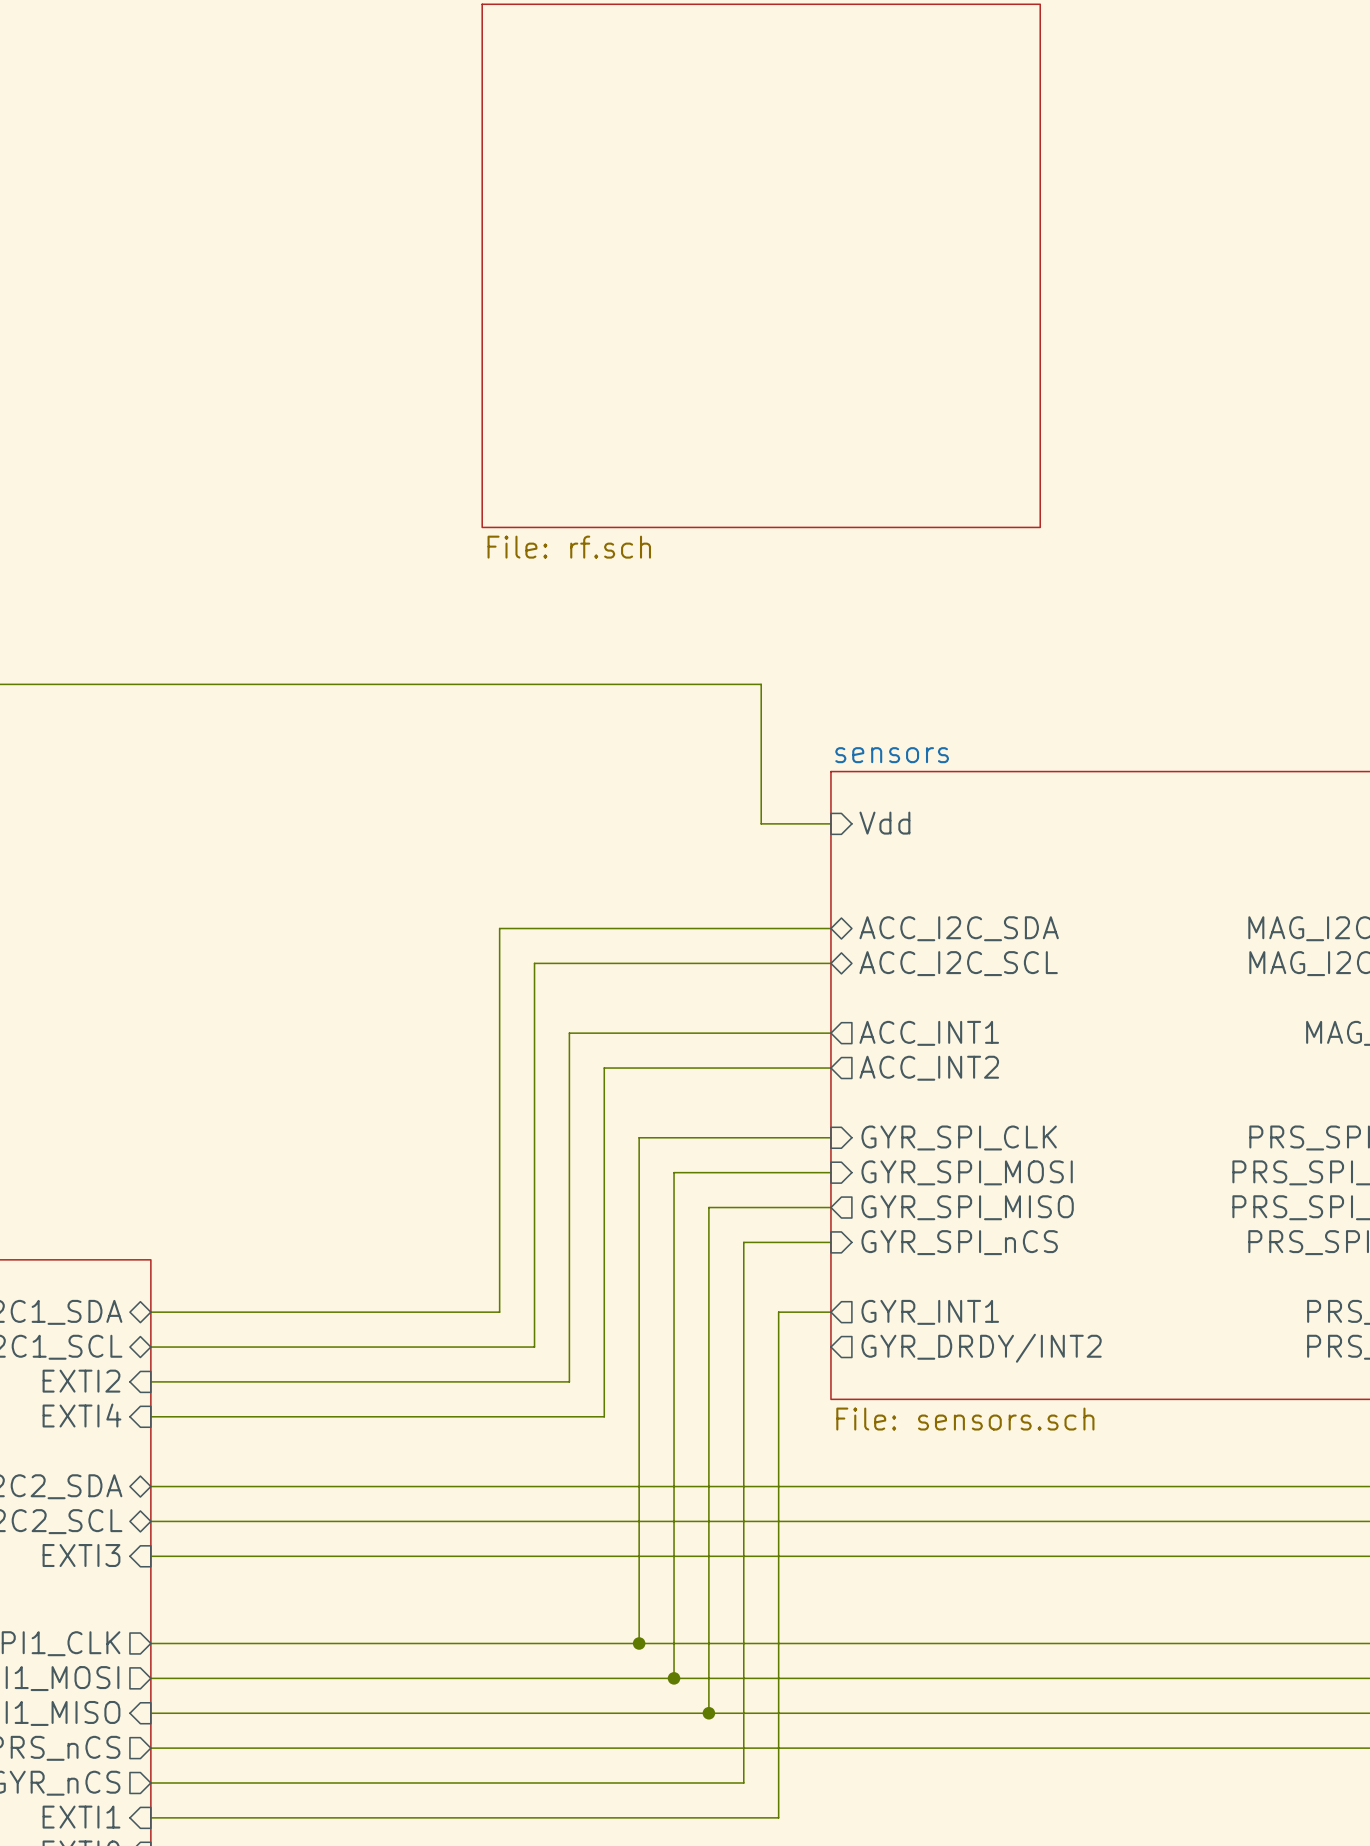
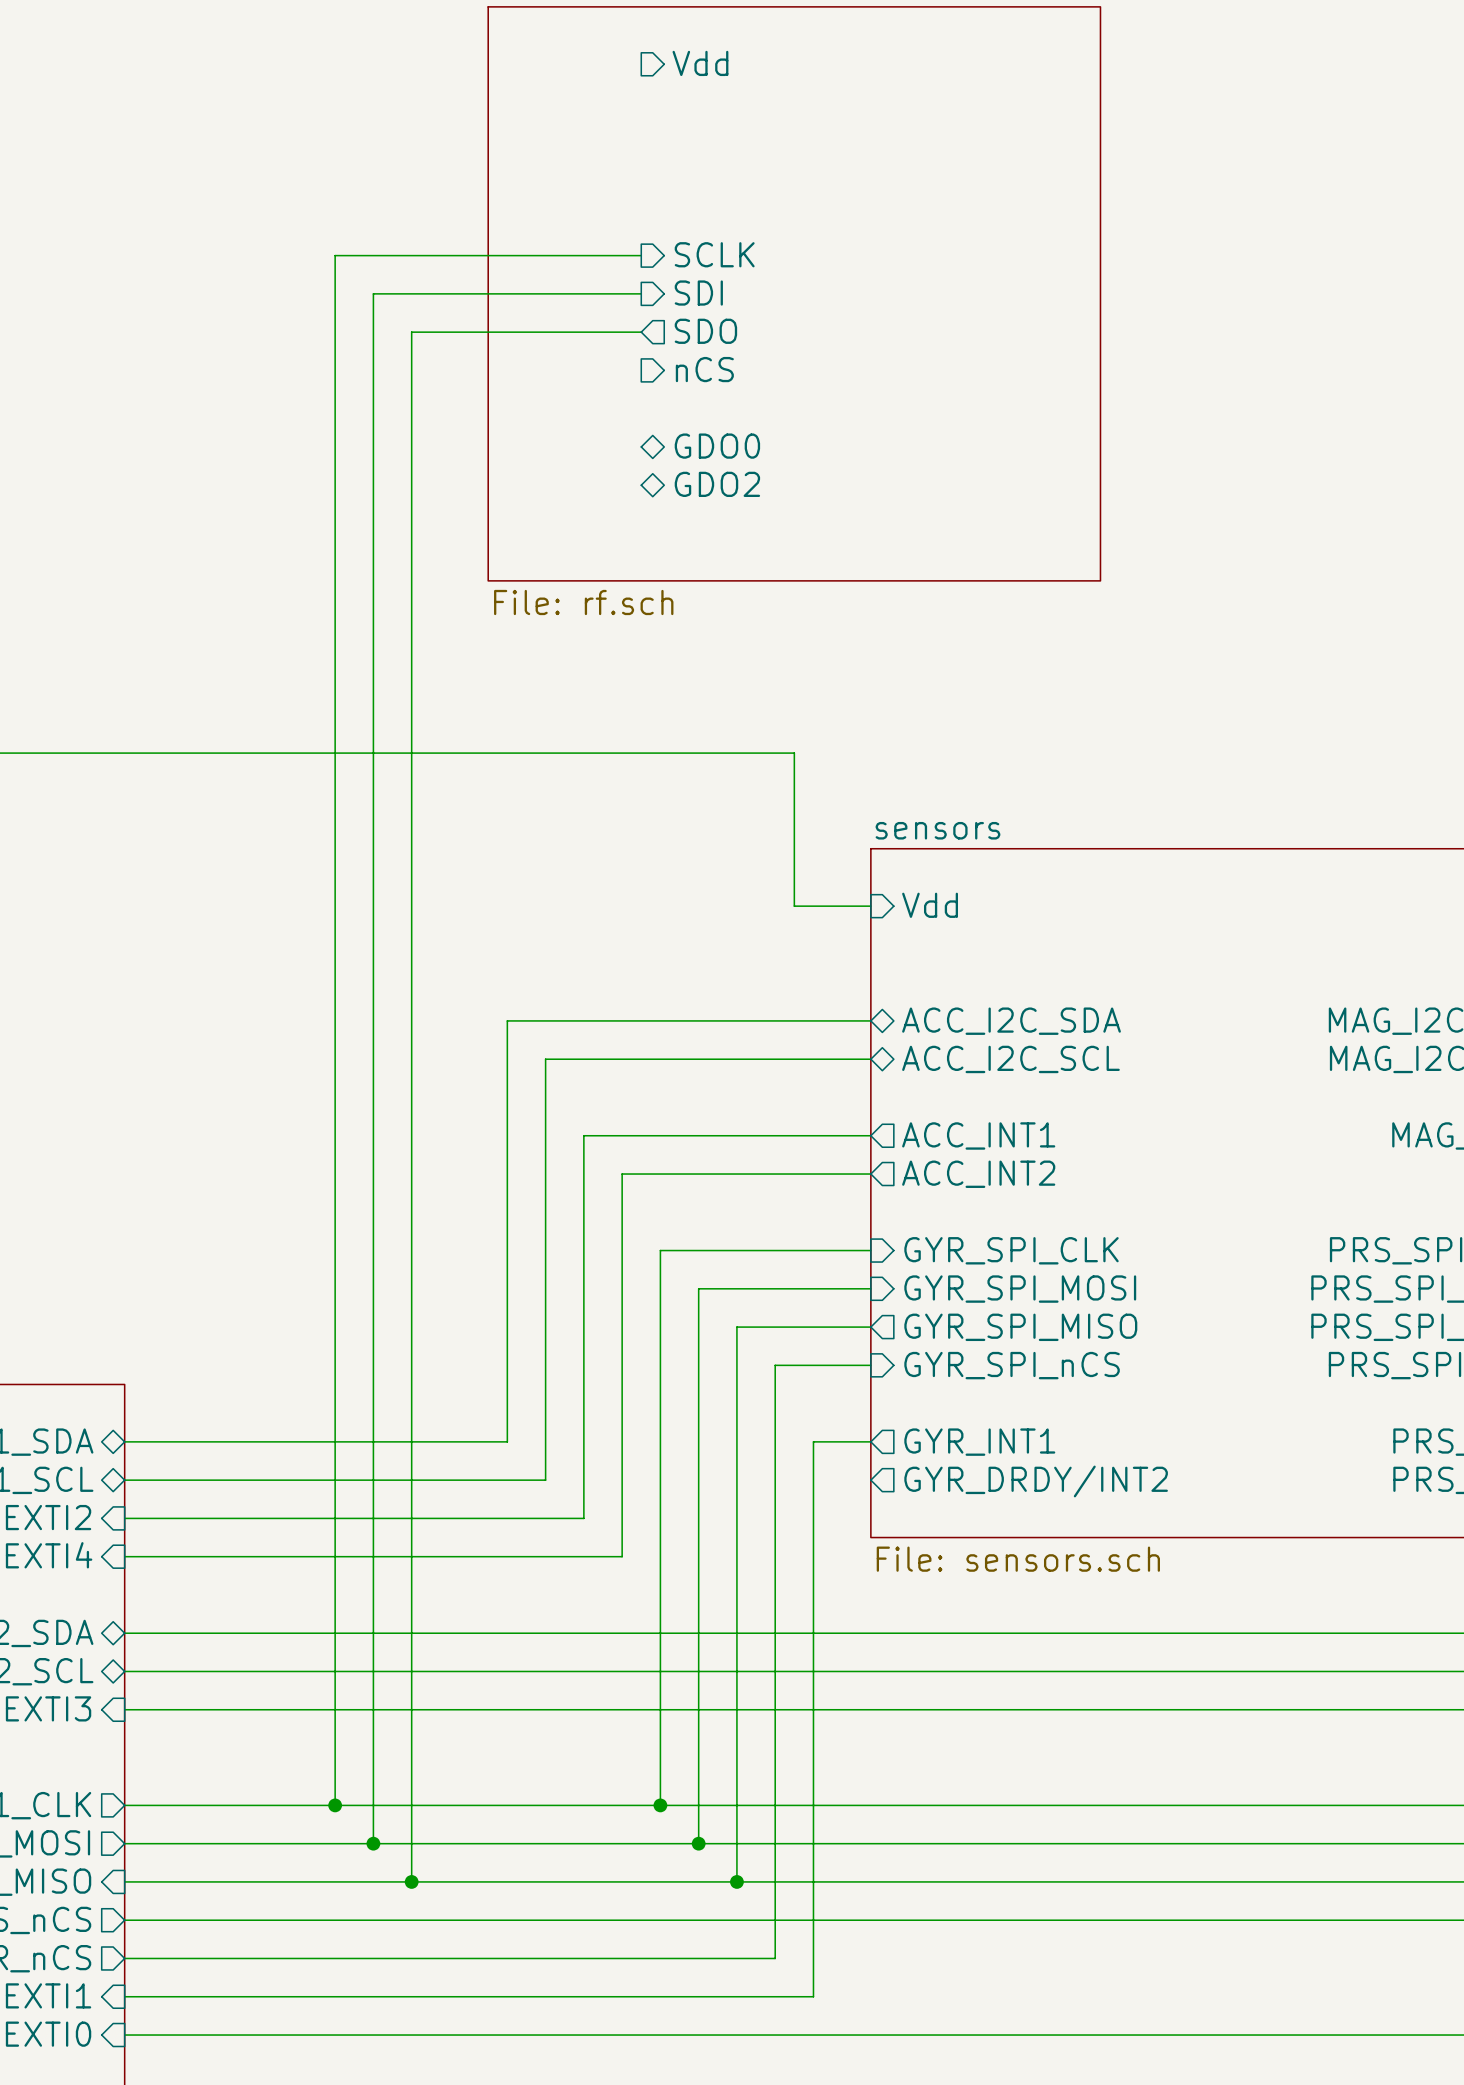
sheet pin: none -> Vdd (700, 63)
wire: none -> (641, 255) (335, 255) (335, 1805)
sheet pin: none -> SCLK (714, 254)
wire: none -> (641, 293) (373, 293) (373, 1843)
sheet pin: none -> SDI (698, 293)
sheet pin: none -> SDO (705, 331)
wire: none -> (641, 332) (411, 332) (411, 1881)
sheet pin: none -> nCS (704, 369)
sheet pin: none -> GDO0 (717, 446)
sheet pin: none -> GDO2 (717, 484)
junction: none -> (335, 1805)
junction: none -> (373, 1843)
junction: none -> (411, 1881)

